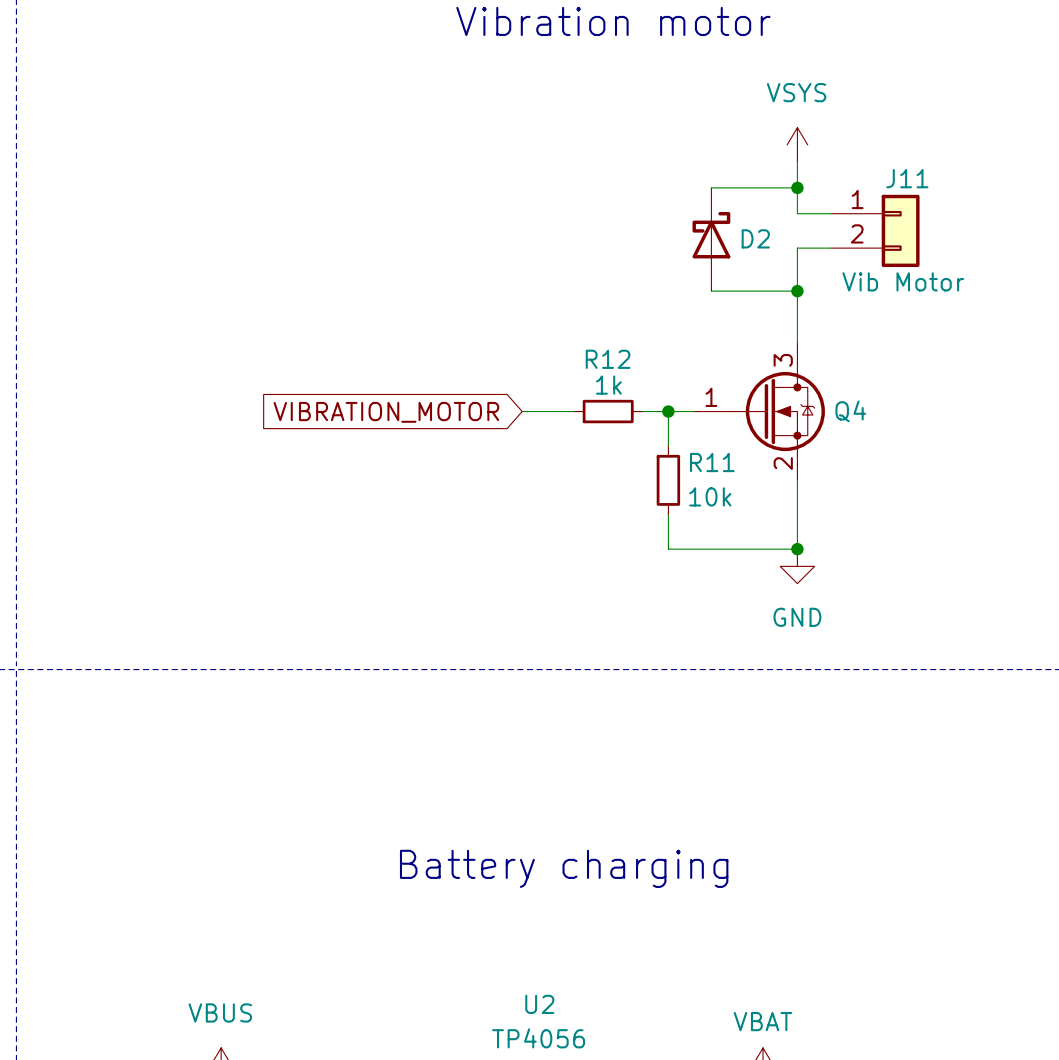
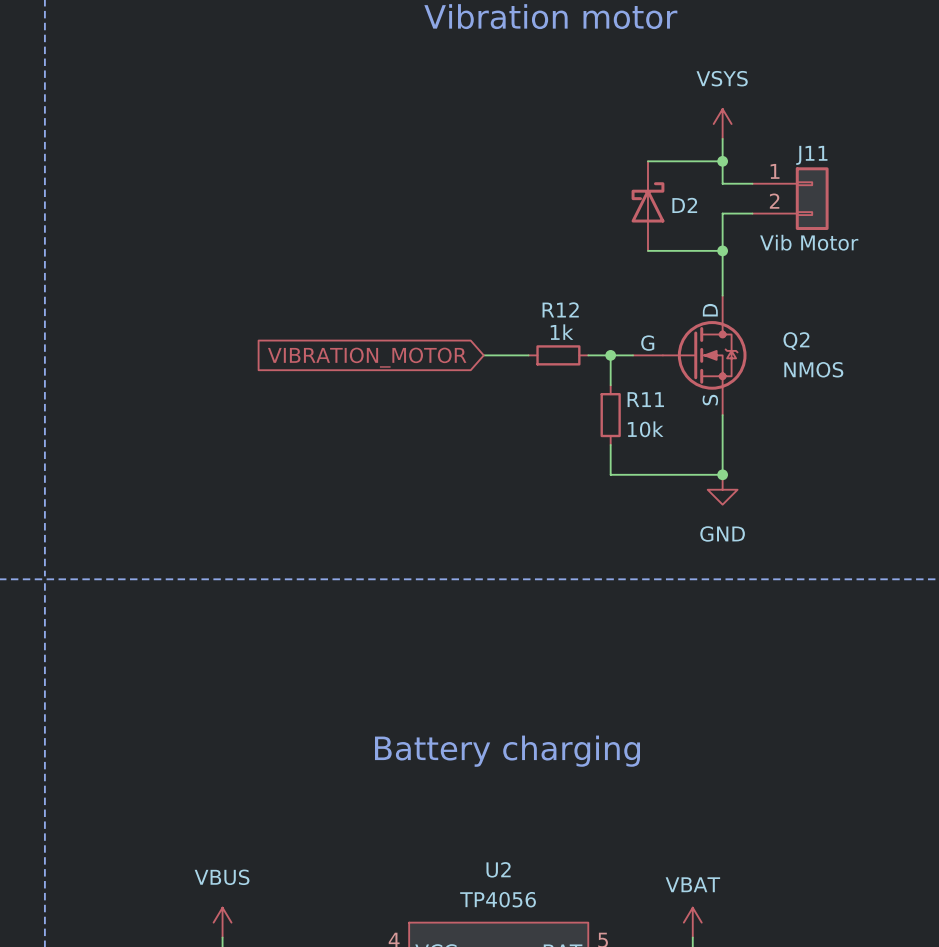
Q4: (759, 411) -> none
Q2: none -> NMOS (689, 355)

